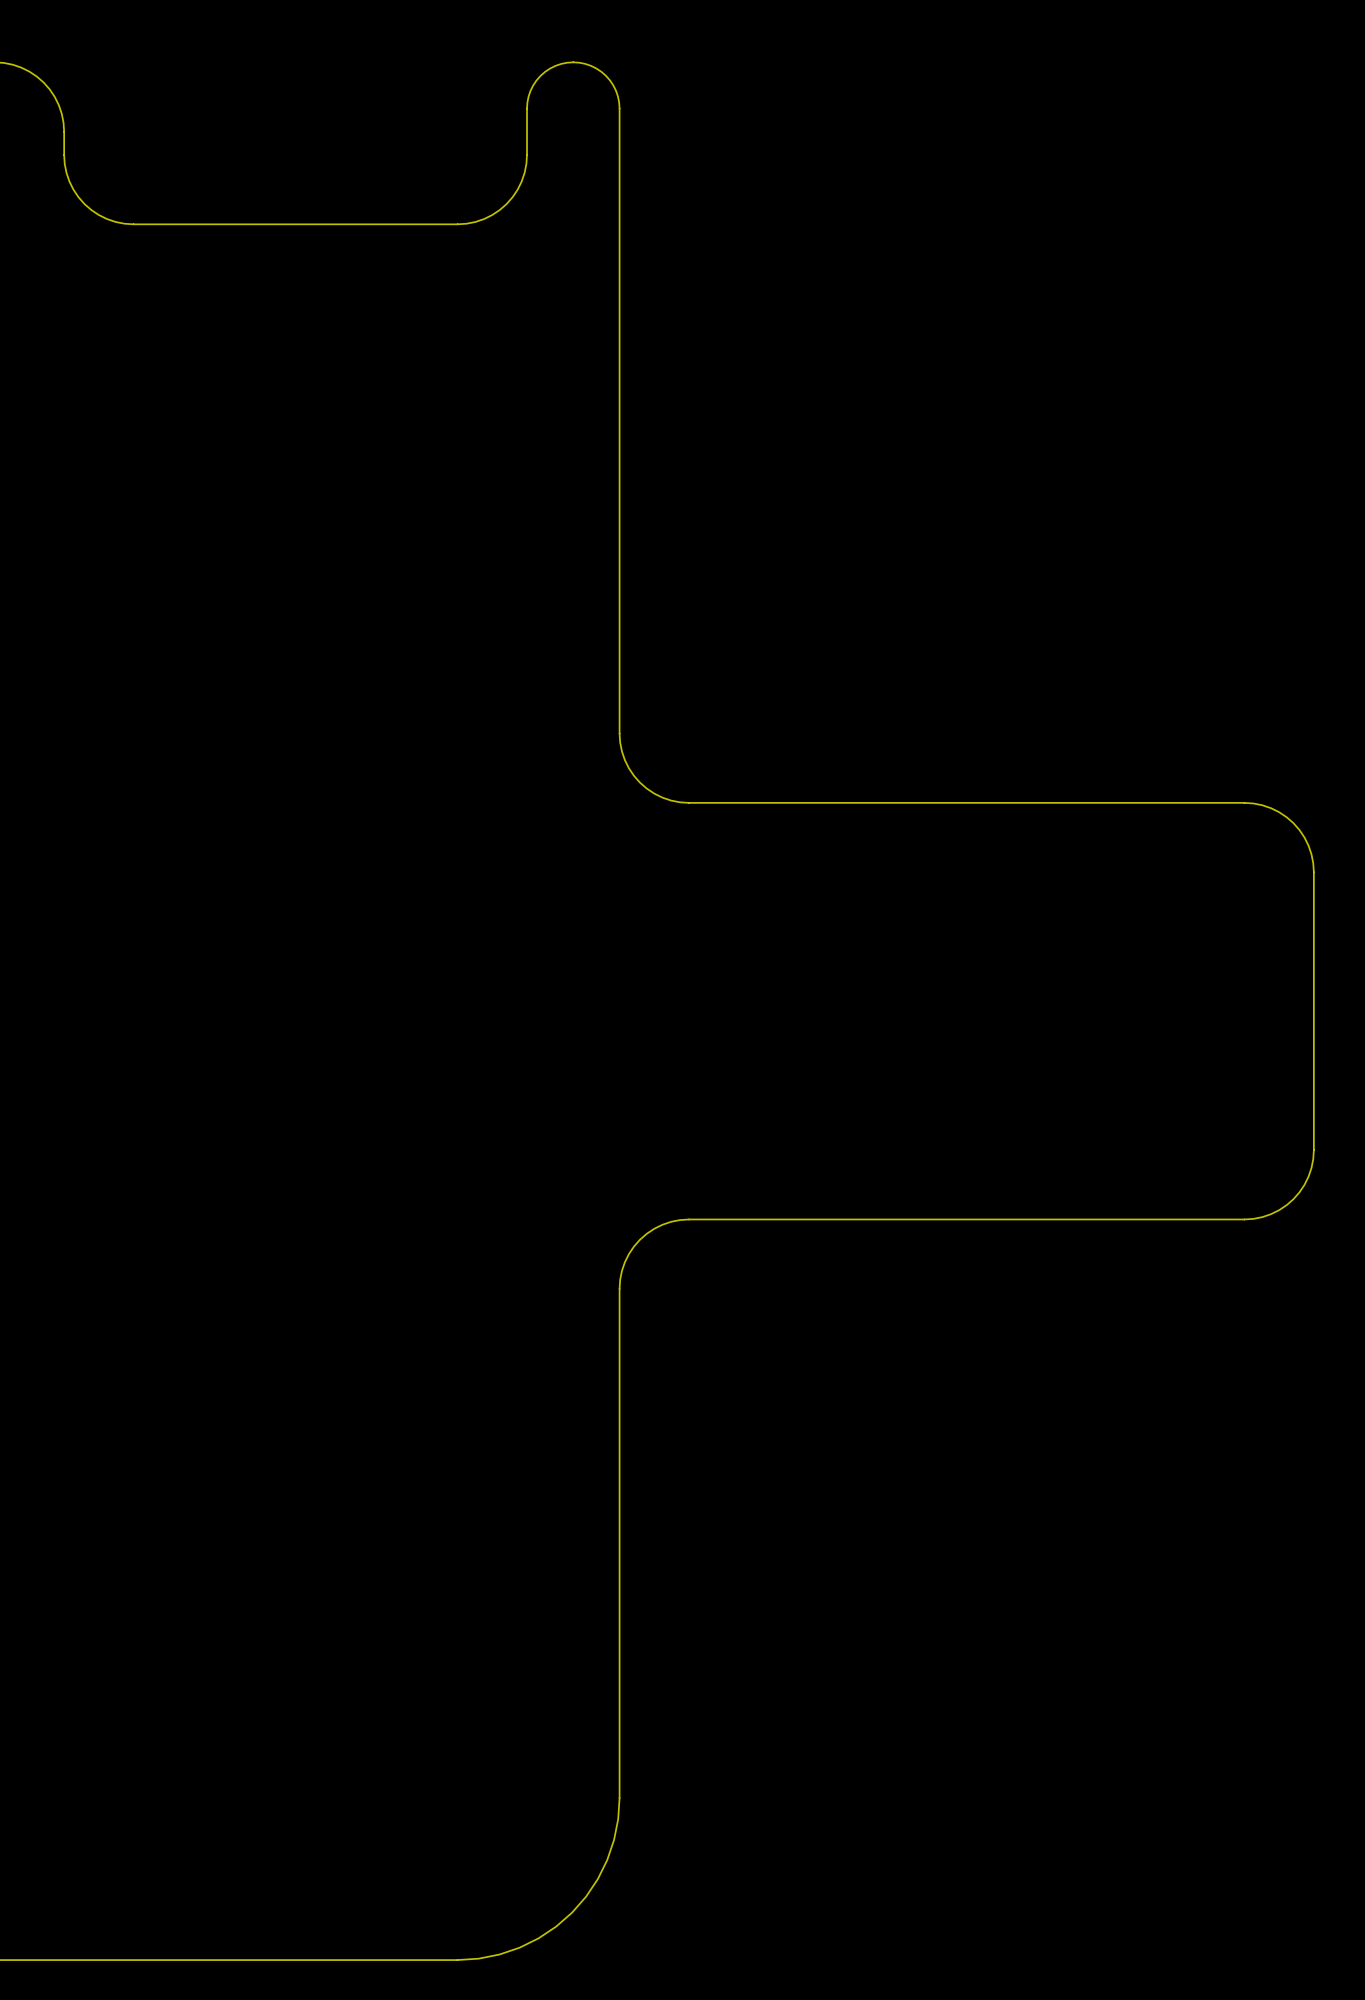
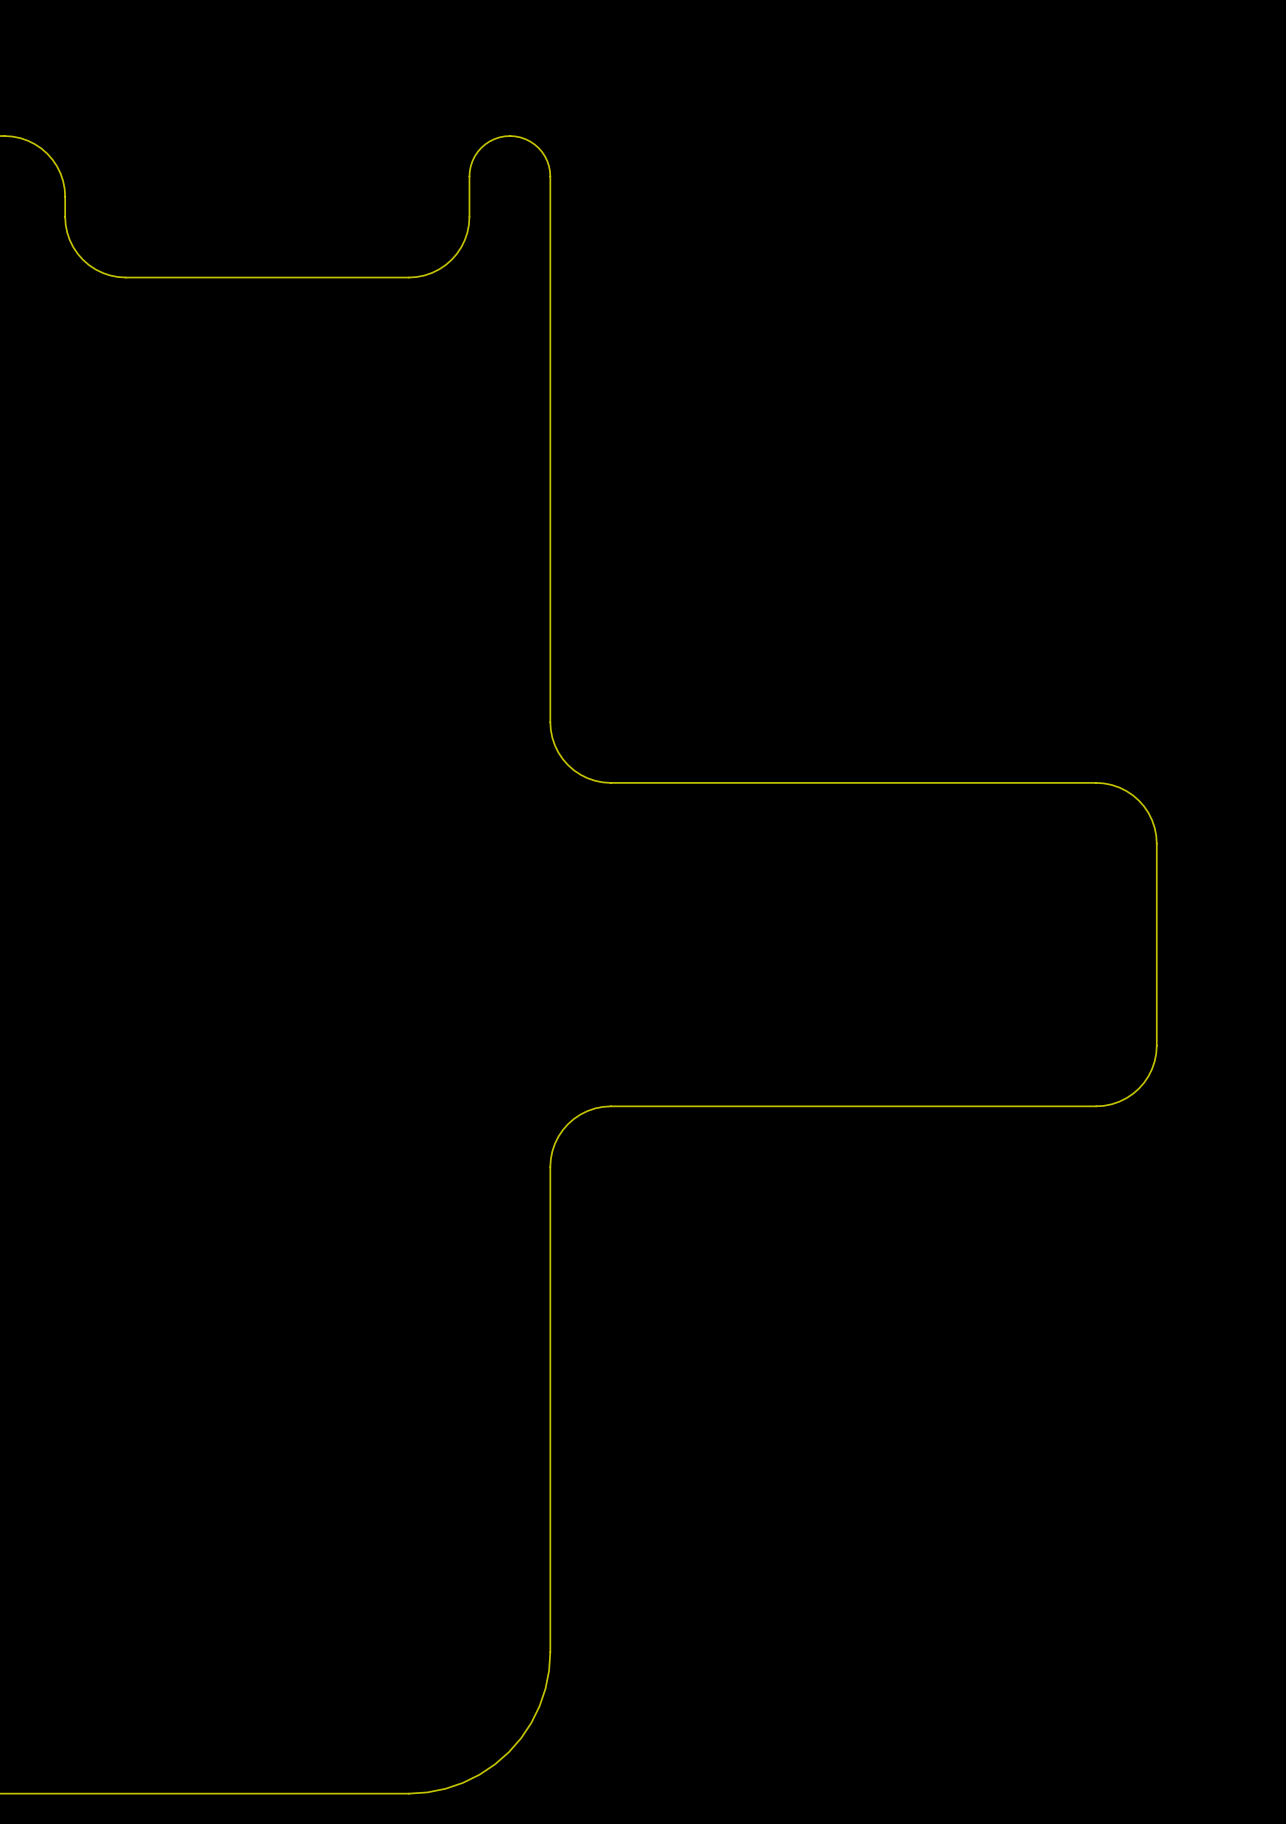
board edge: (1313, 1103) (1313, 1159) (1308, 1176) (1293, 1199) (1279, 1210) (1262, 1217) (1244, 1219) (679, 1220) (662, 1224) (639, 1239) (624, 1262) (619, 1288) -> (1156, 1045) (1152, 1068) (1139, 1088) (1119, 1101) (1104, 1105) (610, 1106) (595, 1108) (580, 1114) (568, 1124) (554, 1143) (550, 1159) (550, 1207)

